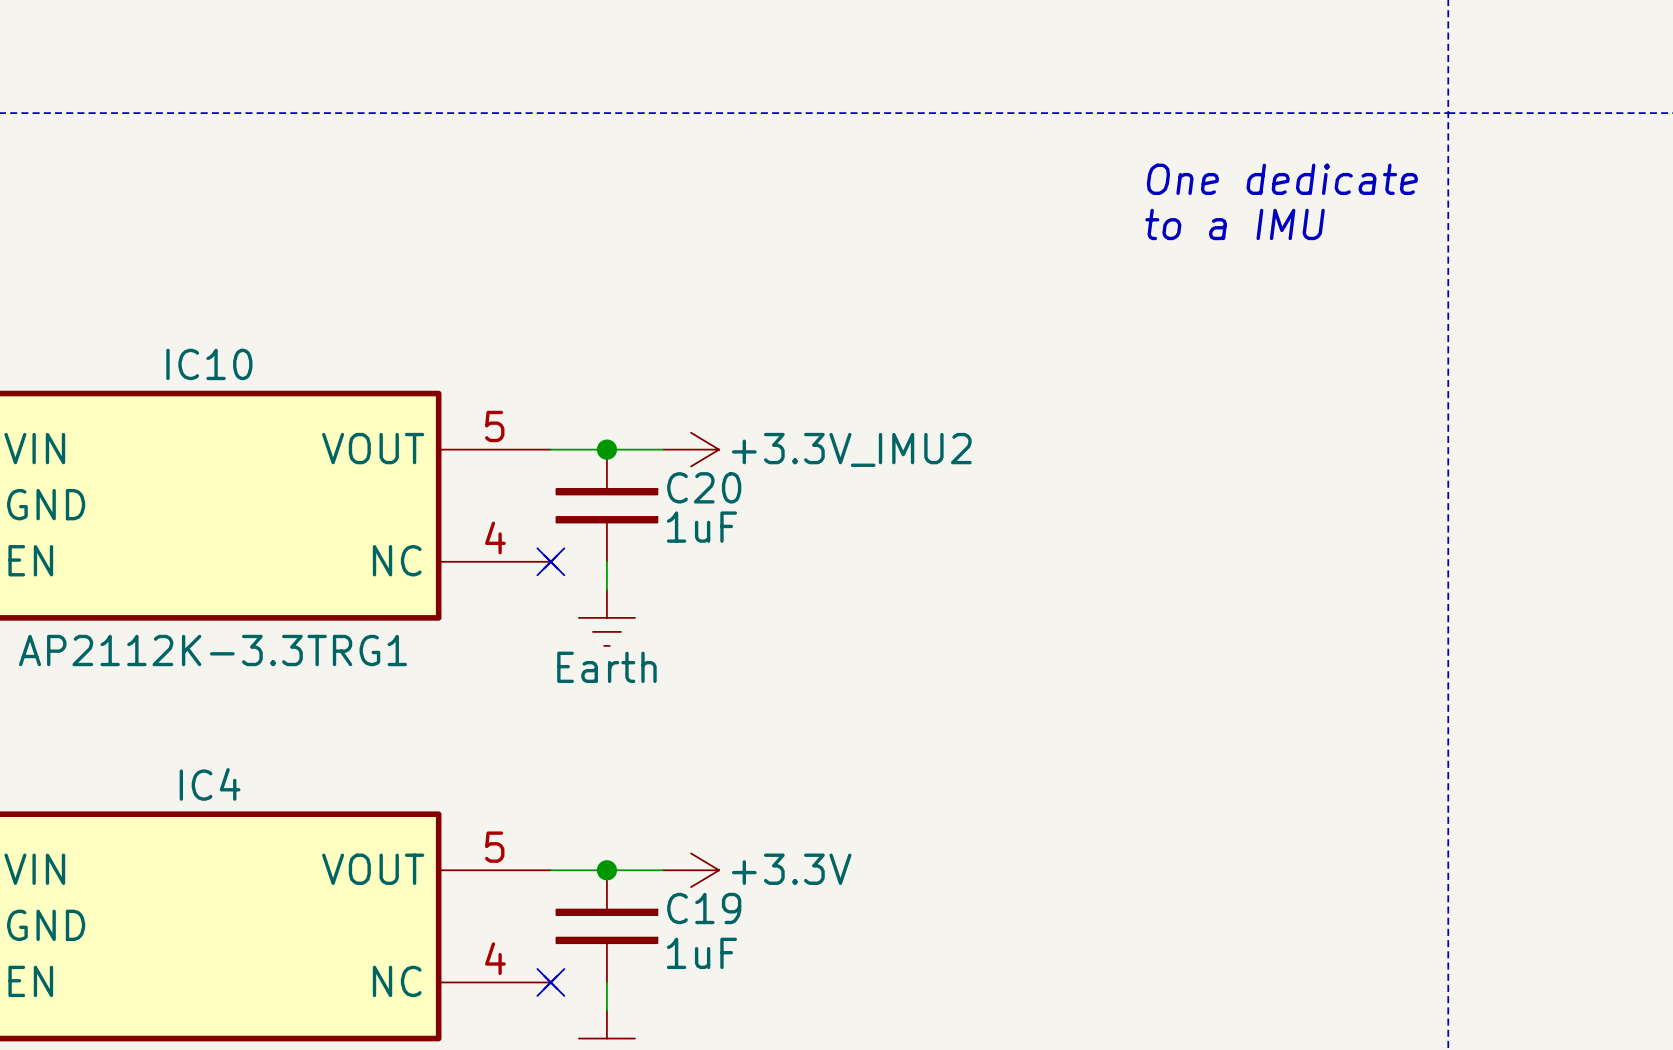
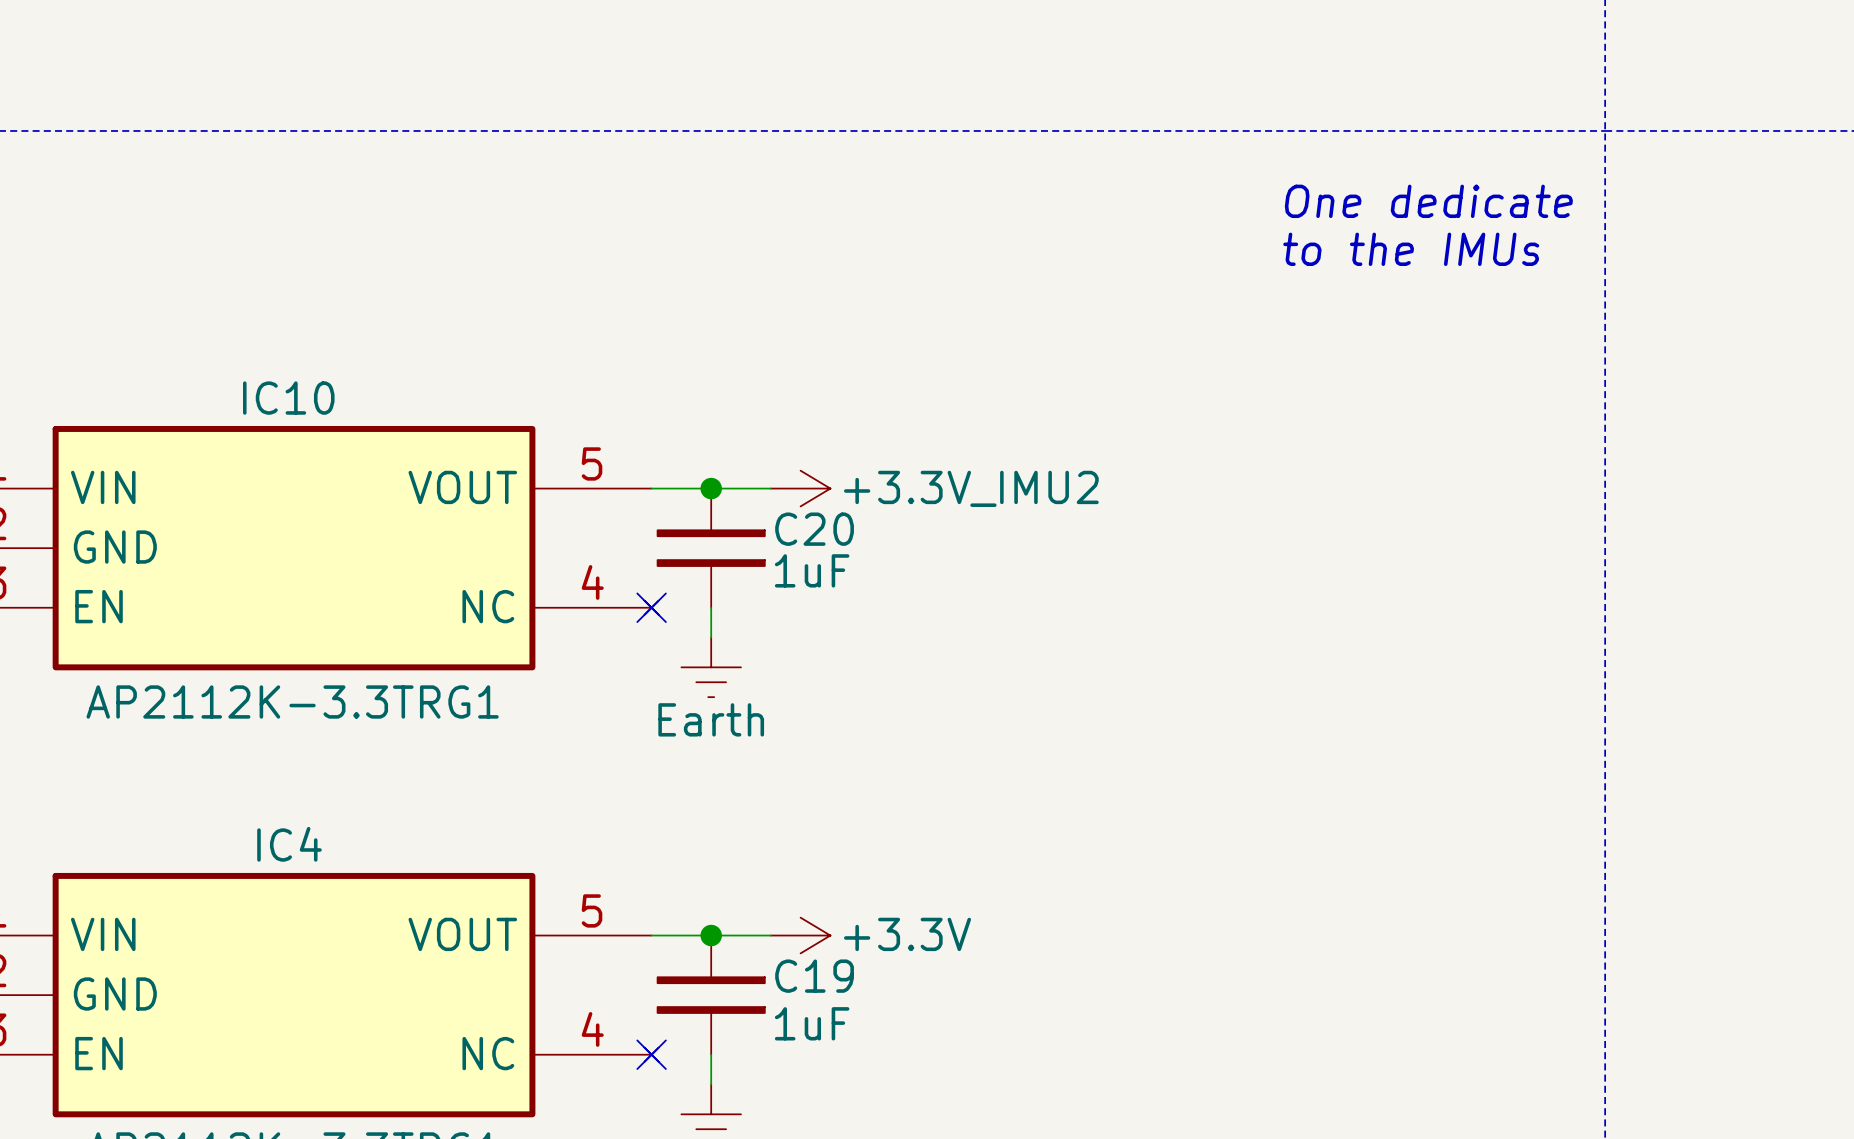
text: to a IMU (1235, 224) -> to the IMUs (1411, 249)

